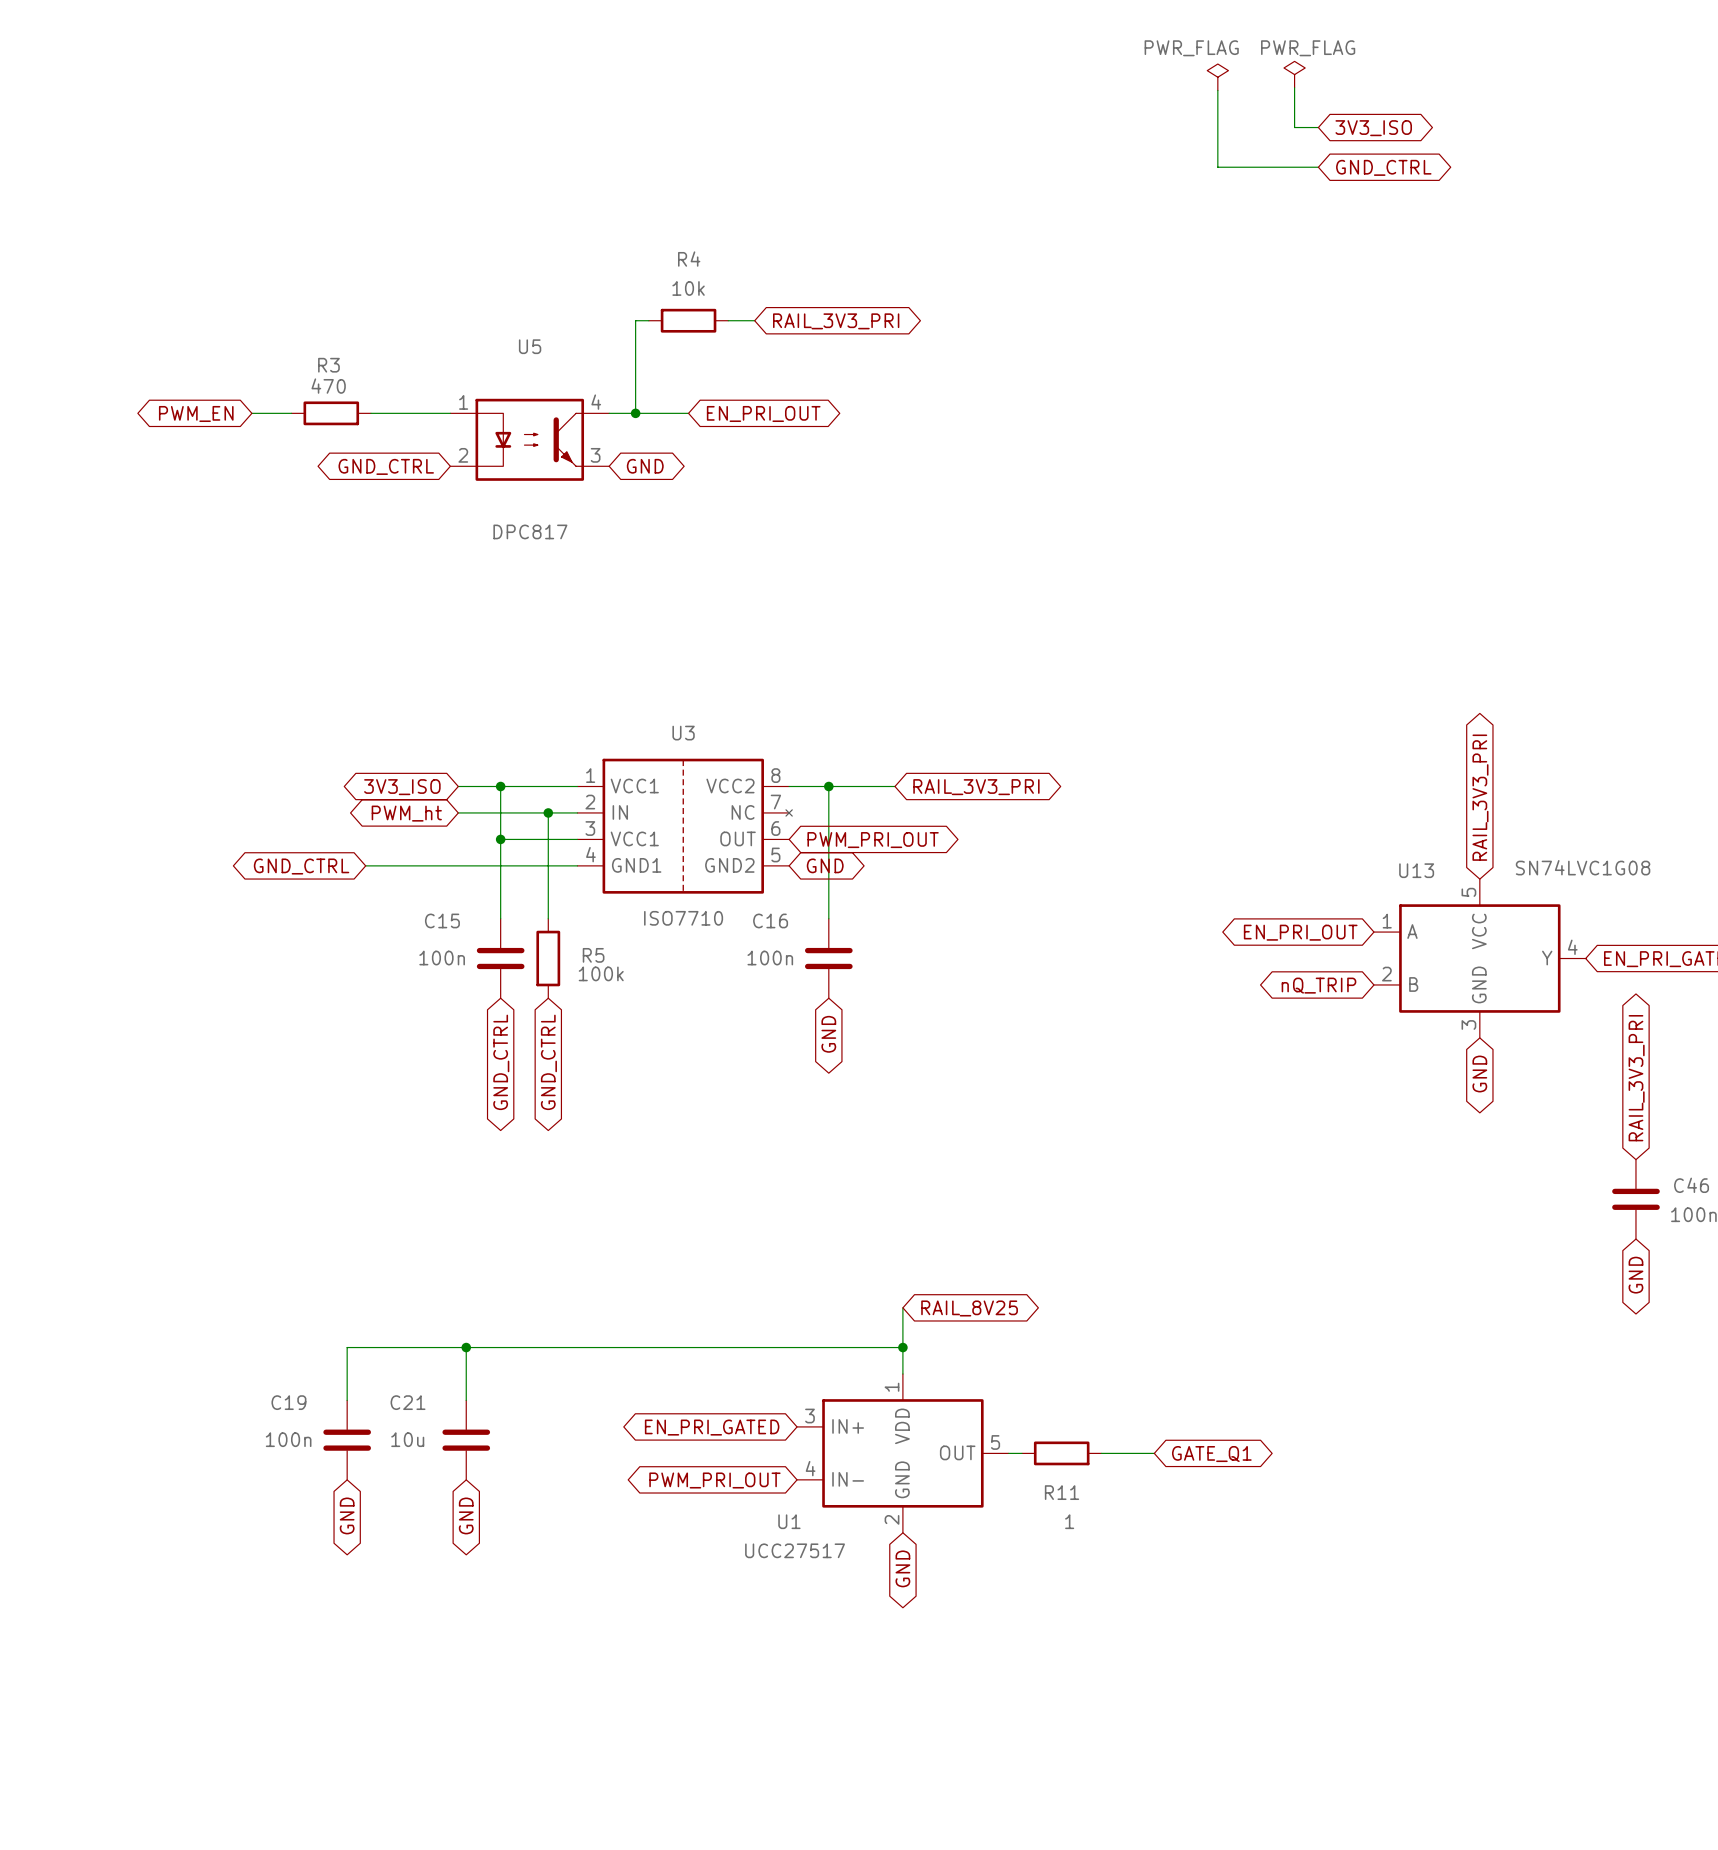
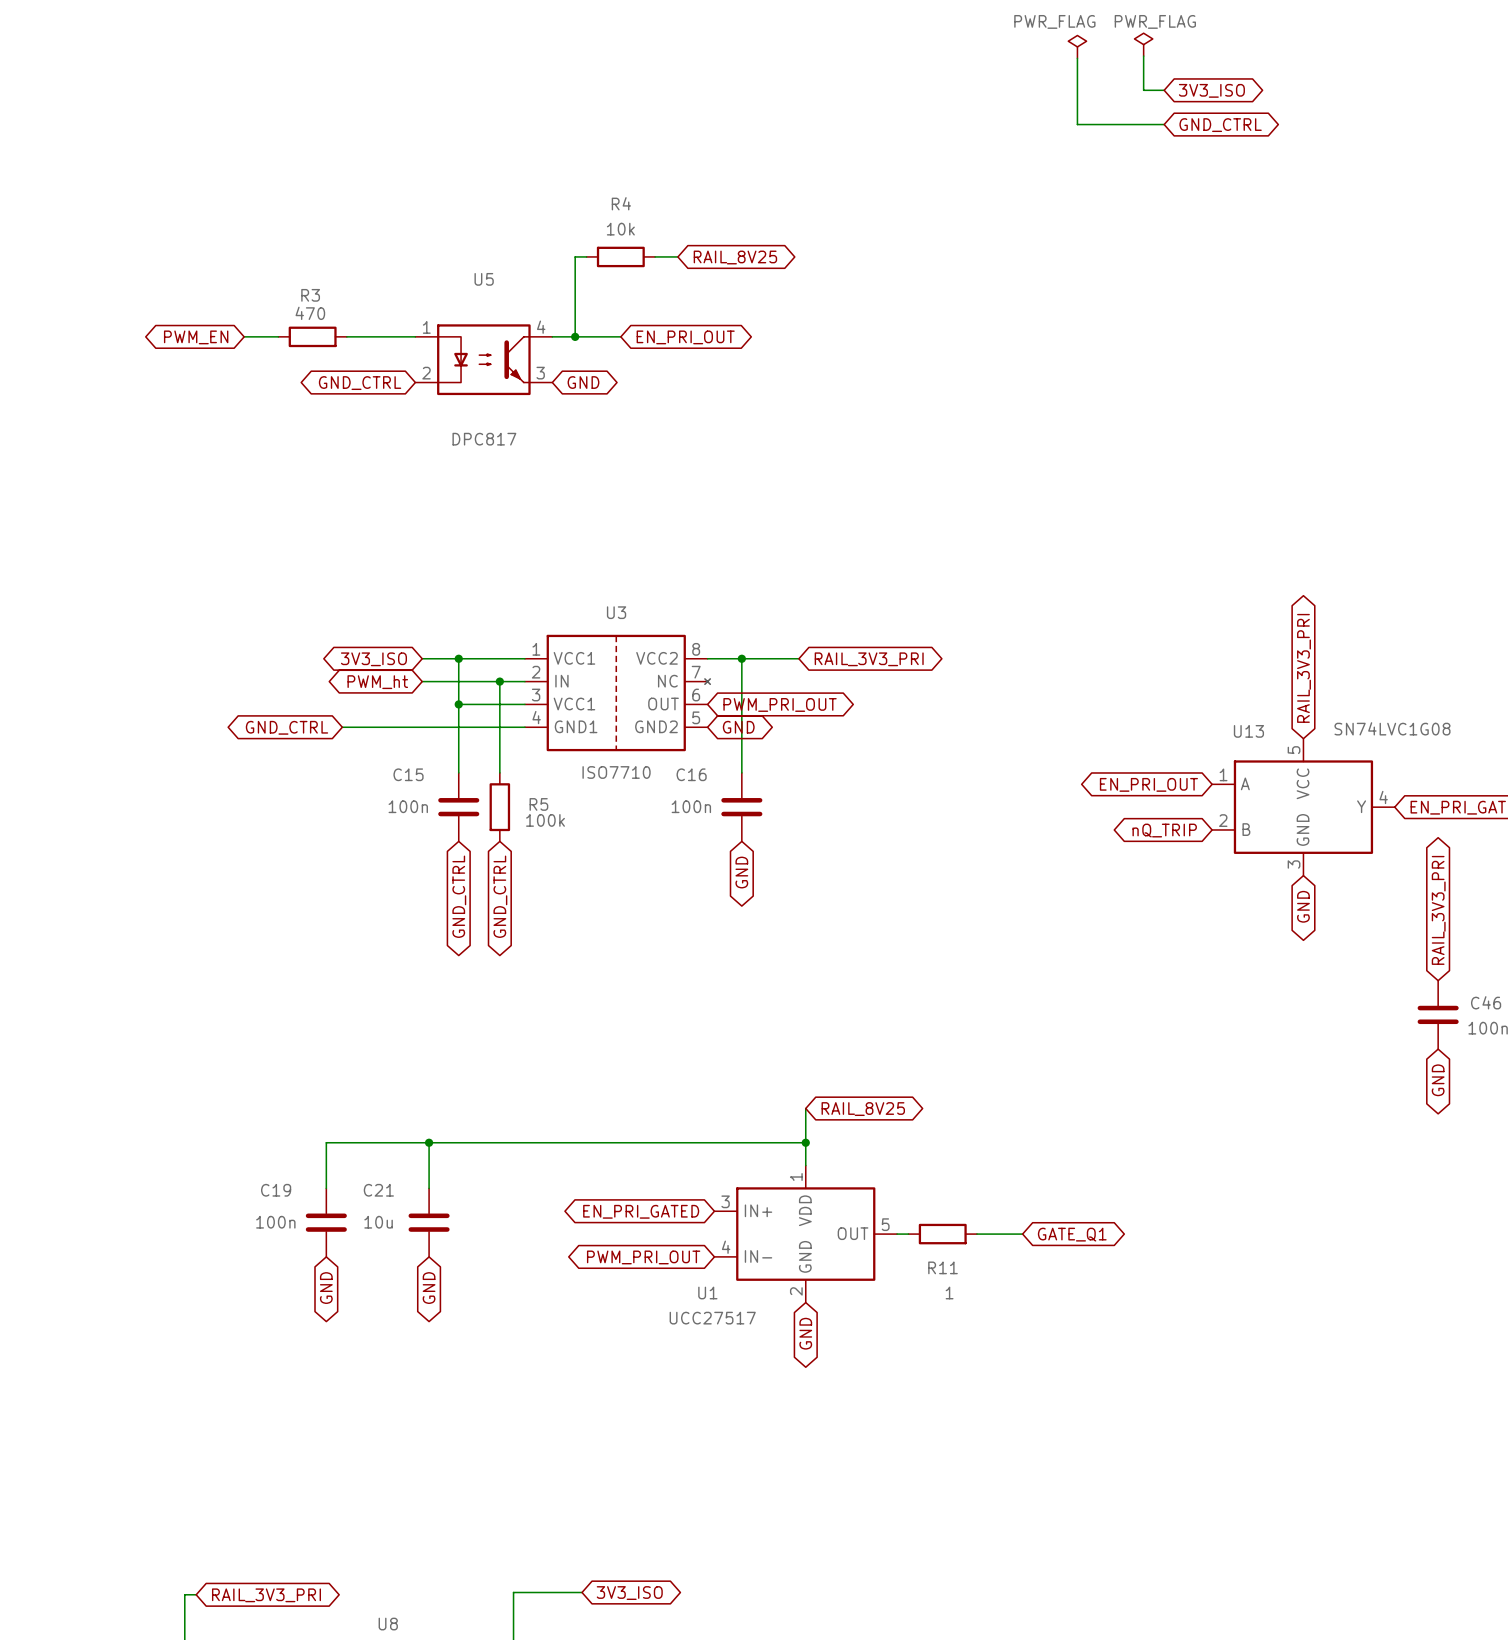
global label: RAIL_3V3_PRI (836, 321) -> RAIL_8V25 (735, 257)

